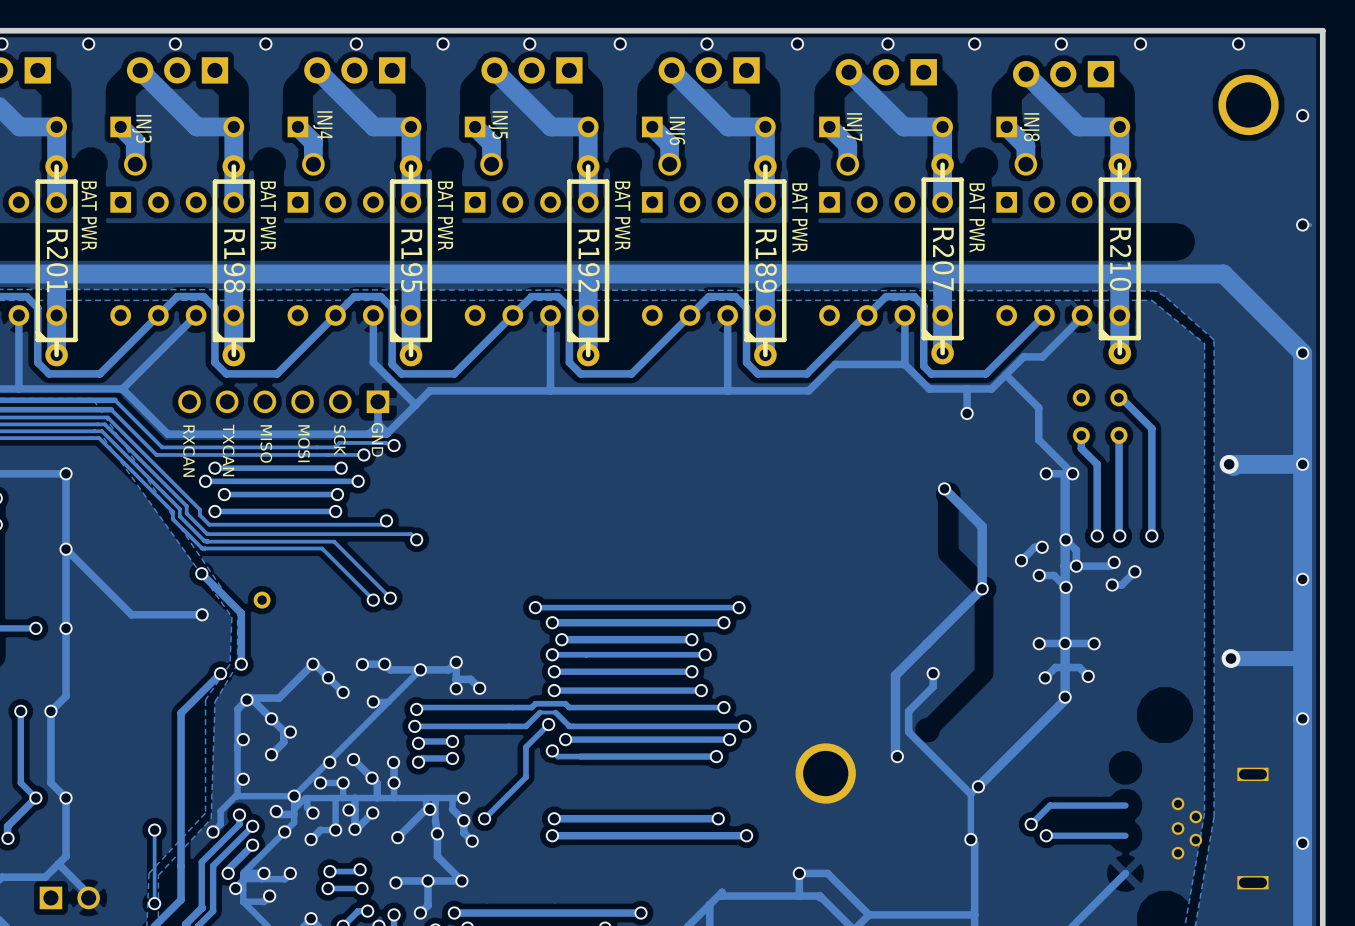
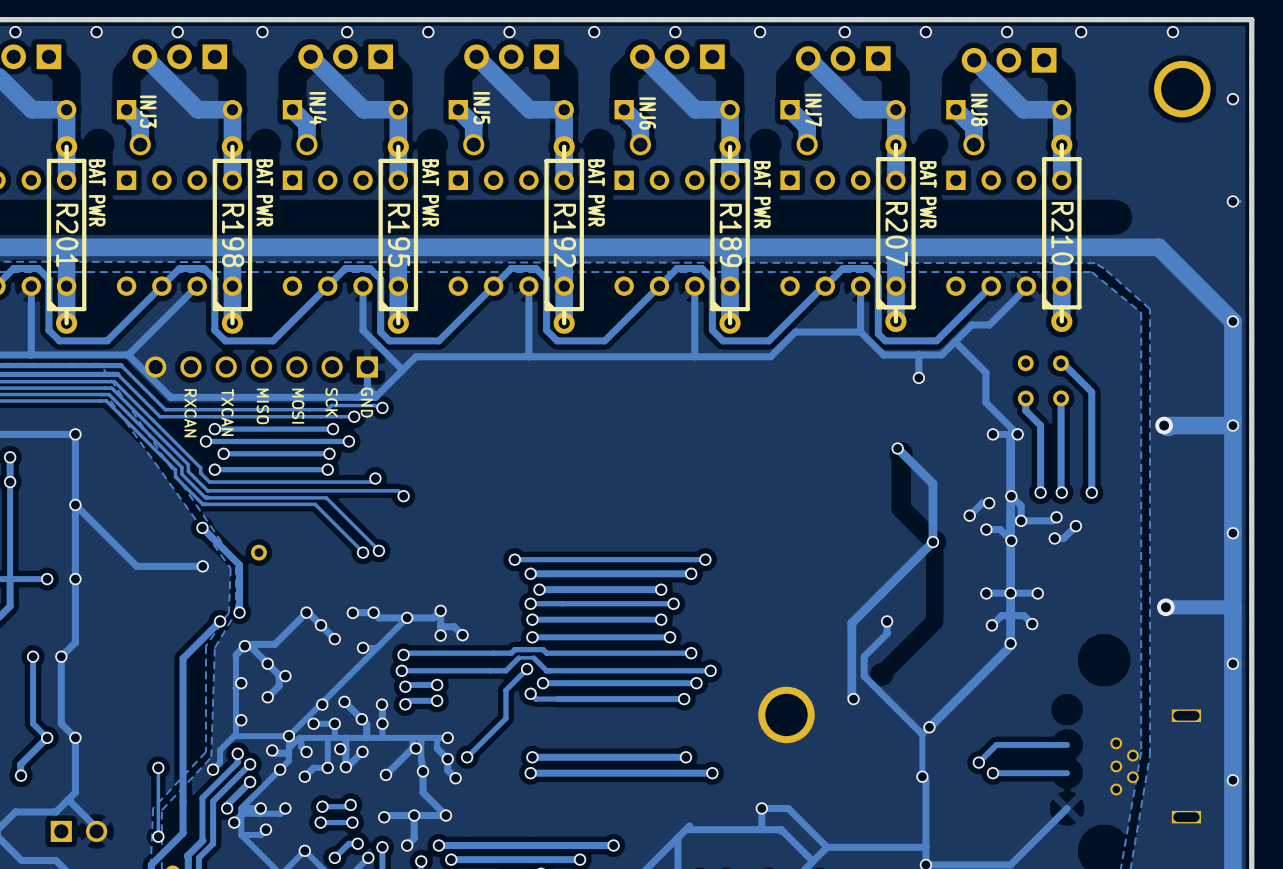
part: none -> (261, 367)

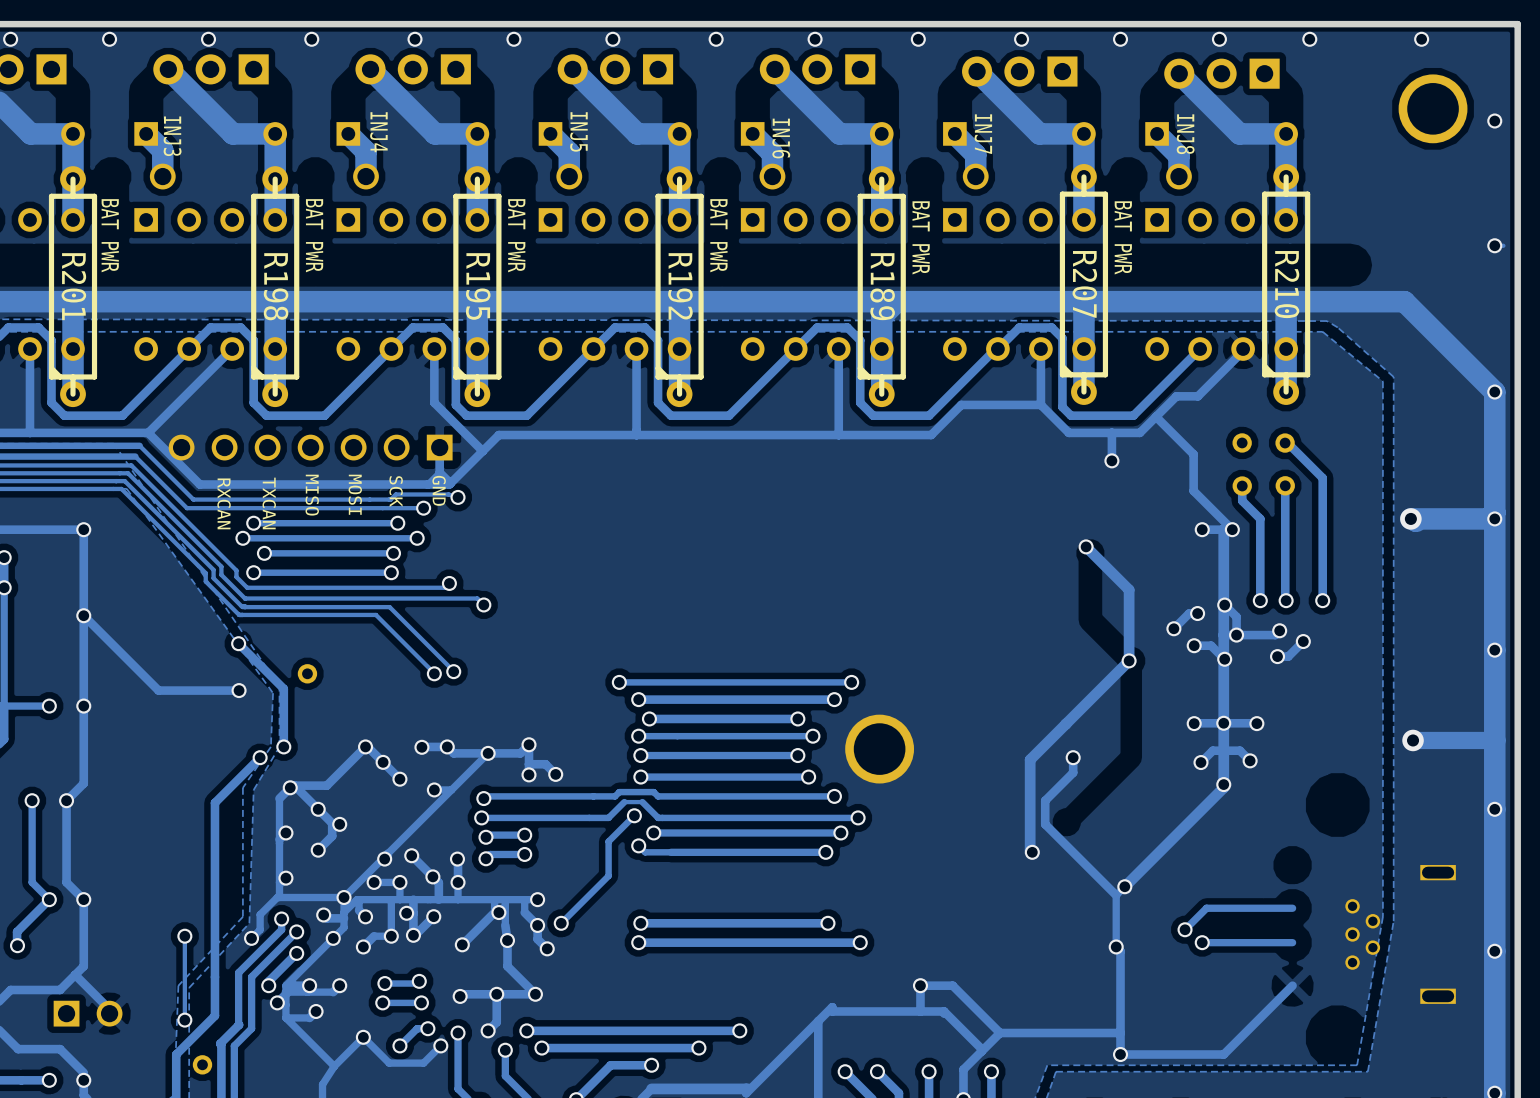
part position: (786, 714) -> (879, 749)

